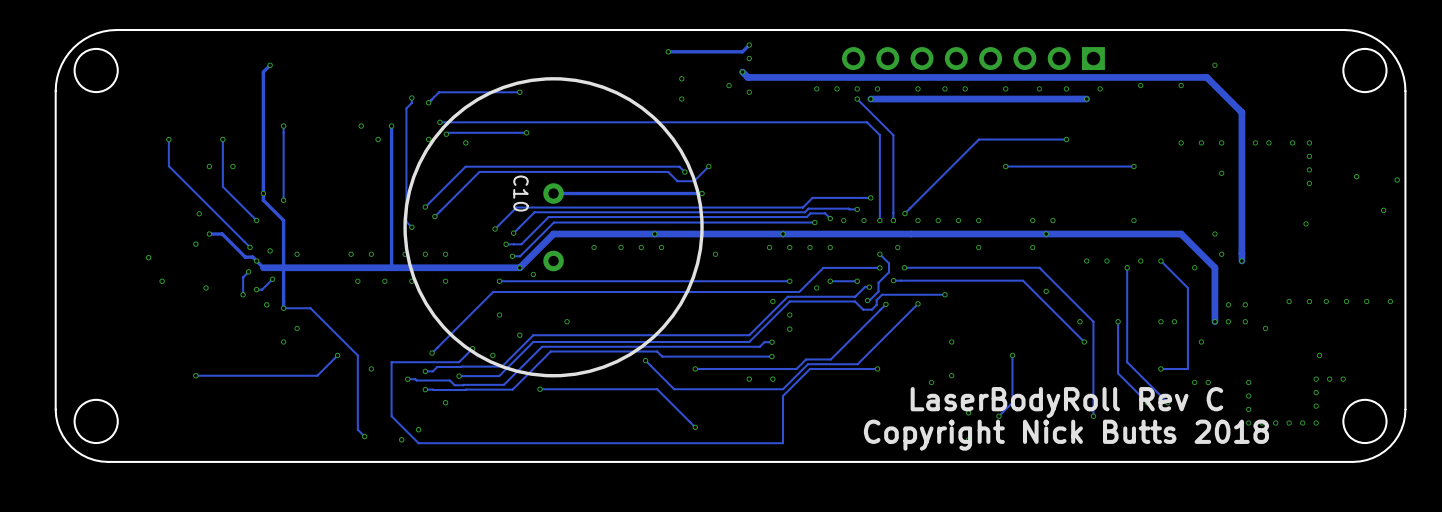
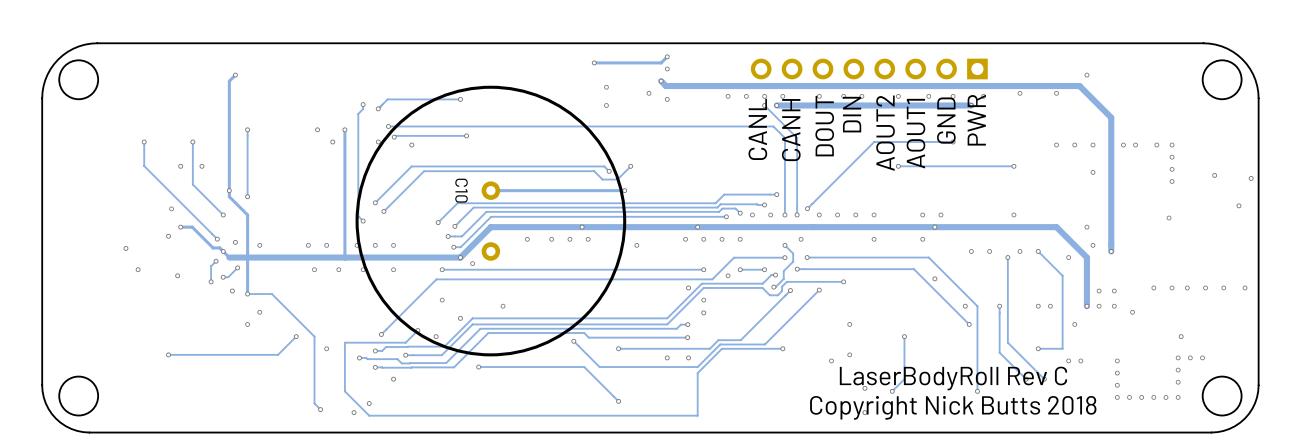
text: none -> DIN (852, 114)
text: none -> GND (946, 120)
text: none -> PWR (976, 120)
text: none -> DOUT (824, 126)
text: none -> CANL (757, 129)
text: none -> CANH (791, 130)
text: none -> AOUT2 (885, 133)
text: none -> AOUT1 (915, 133)

